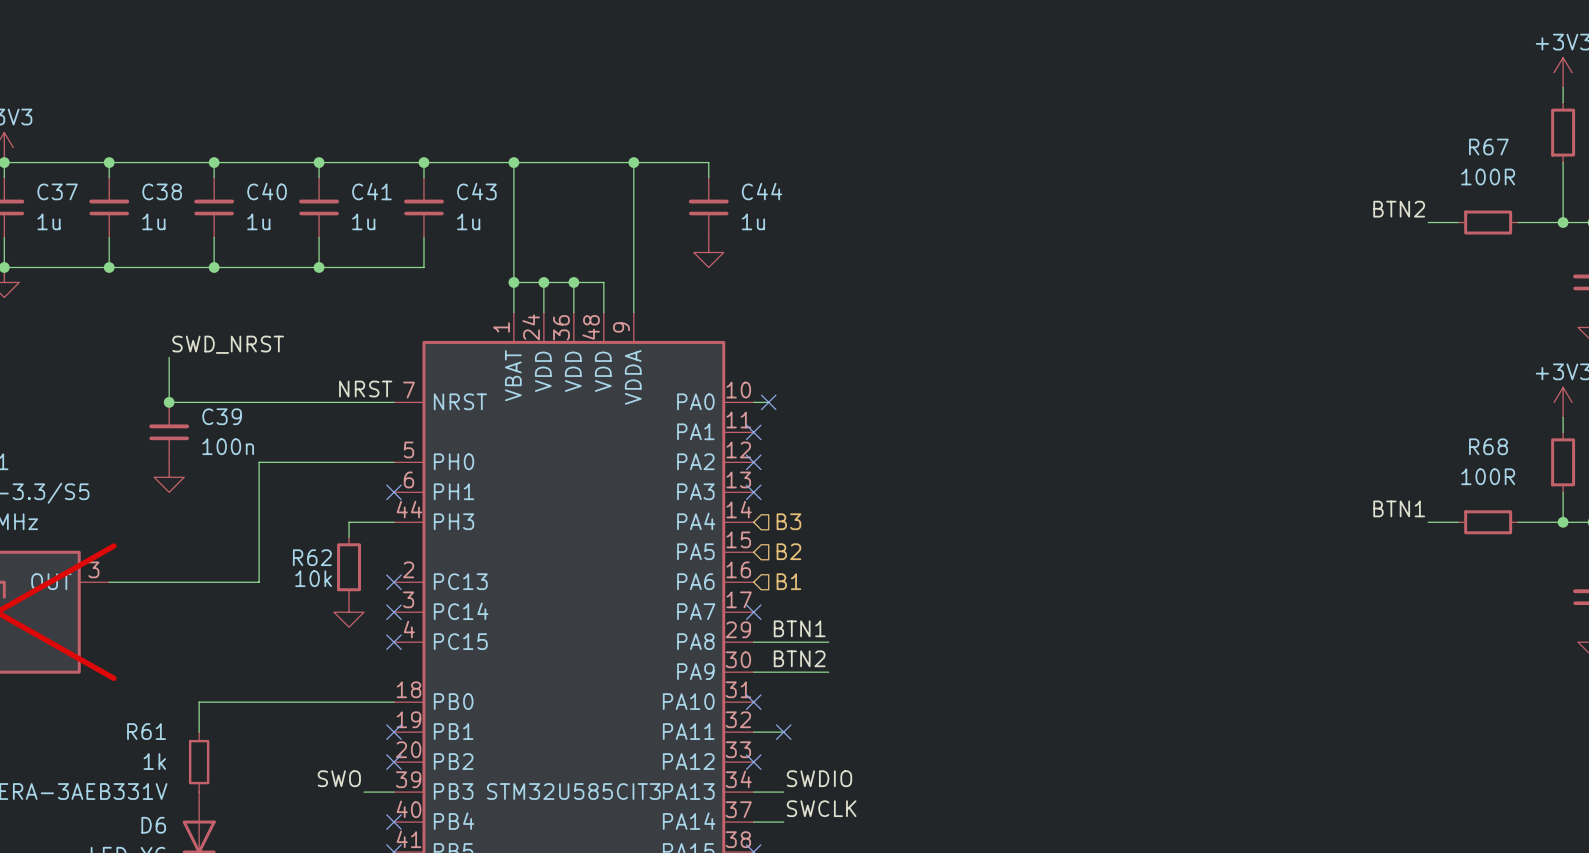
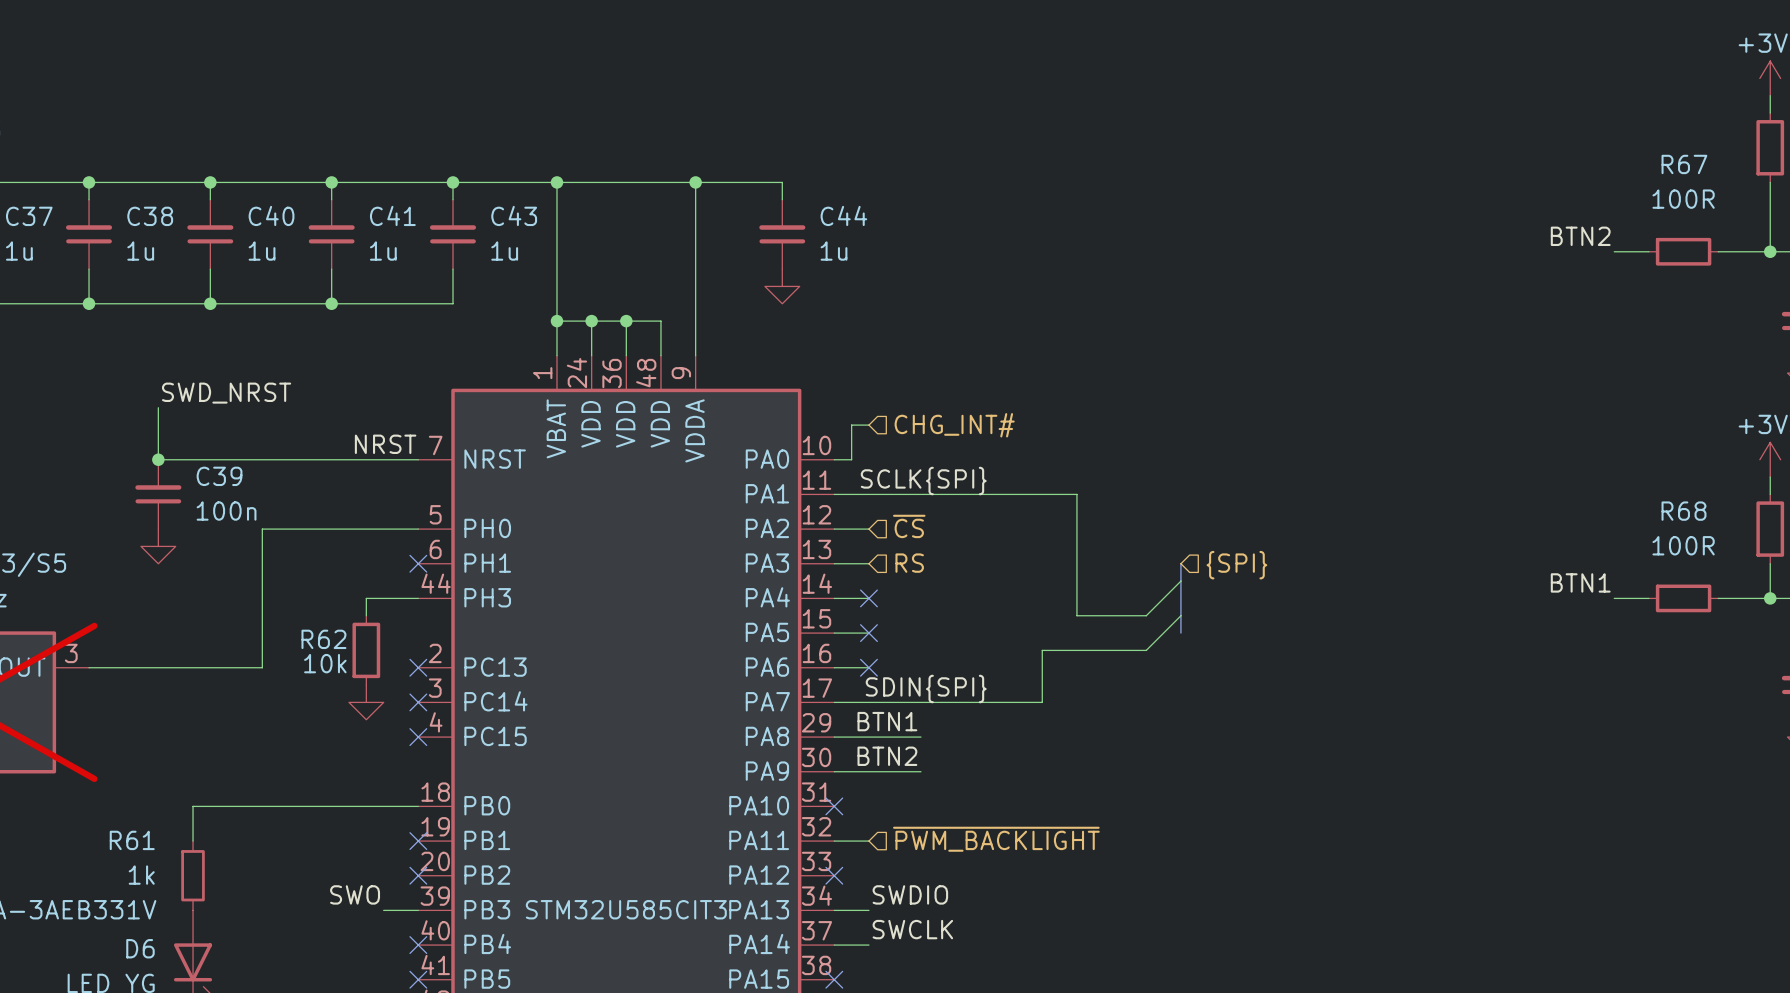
wire: none -> (868, 425) (851, 425) (851, 459)
hierarchical label: none -> CHG_INT# (954, 425)
no-connect mark: (768, 402) -> none
label: none -> SCLK{SPI} (923, 481)
wire: none -> (834, 494) (1076, 494) (1076, 615) (1146, 615) (1180, 581)
no-connect mark: (753, 432) -> none
hierarchical label: none -> ~{CS} (909, 526)
wire: none -> (834, 529) (868, 529)
no-connect mark: (753, 462) -> none
hierarchical label: none -> RS (909, 563)
wire: none -> (834, 563) (868, 563)
no-connect mark: (753, 492) -> none
bus: none -> (1180, 563) (1180, 633)
hierarchical label: none -> {SPI} (1236, 565)
hierarchical label: B3 (788, 521) -> none
wire: none -> (834, 598) (868, 598)
no-connect mark: none -> (868, 598)
wire: none -> (1180, 615) (1146, 650) (1042, 650) (1042, 702) (834, 702)
hierarchical label: B2 (788, 551) -> none
wire: none -> (834, 633) (868, 633)
no-connect mark: none -> (868, 633)
hierarchical label: B1 (788, 581) -> none
wire: none -> (834, 667) (868, 667)
no-connect mark: none -> (868, 667)
label: none -> SDIN{SPI} (926, 689)
no-connect mark: (753, 612) -> none
hierarchical label: none -> ~{PWM_BACKLIGHT} (996, 839)
no-connect mark: (783, 732) -> none

